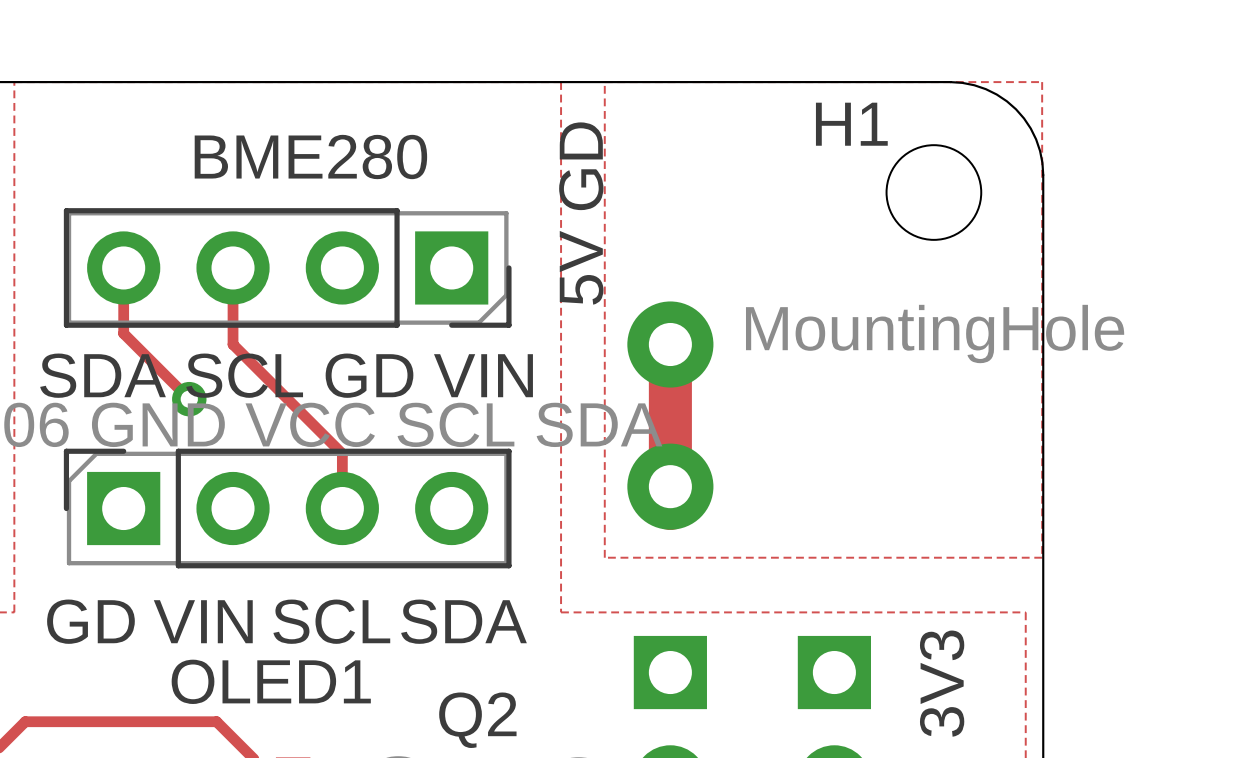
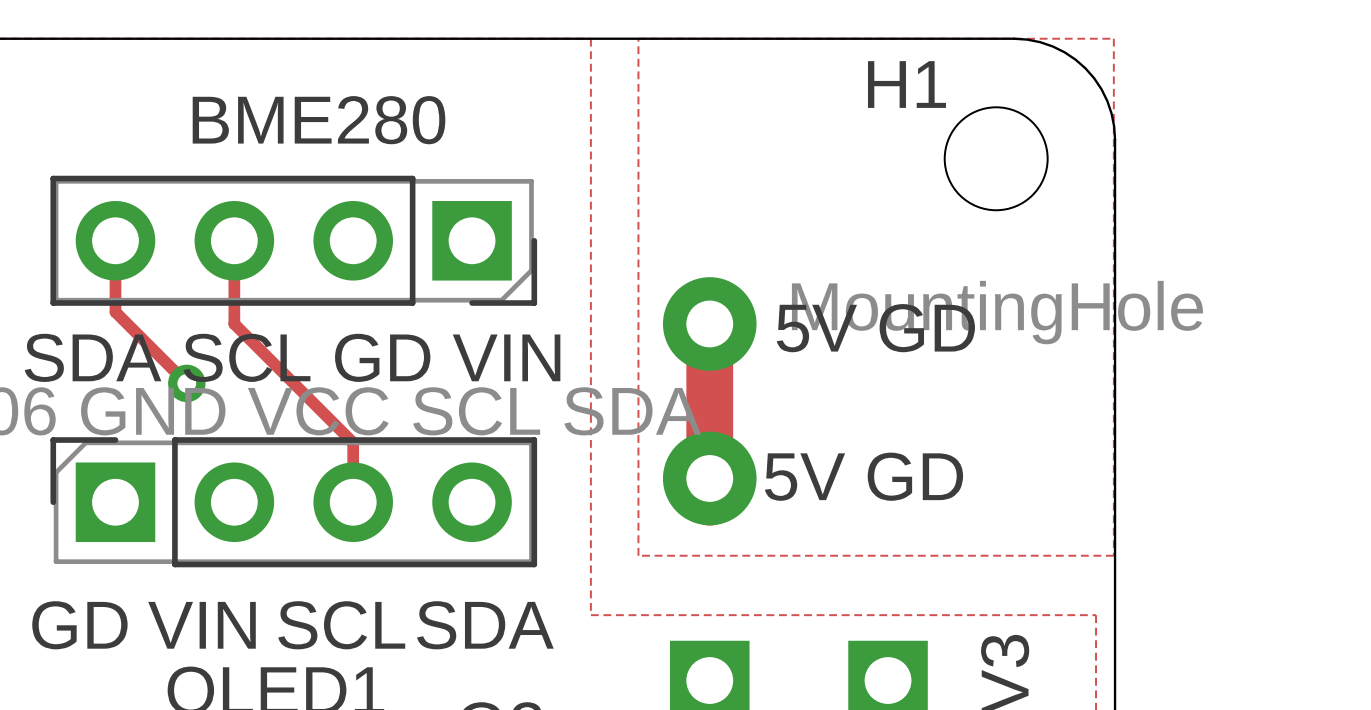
text: 5V GD (581, 213) -> none
text: none -> 5V GD (875, 328)
text: none -> 5V GD (864, 476)

